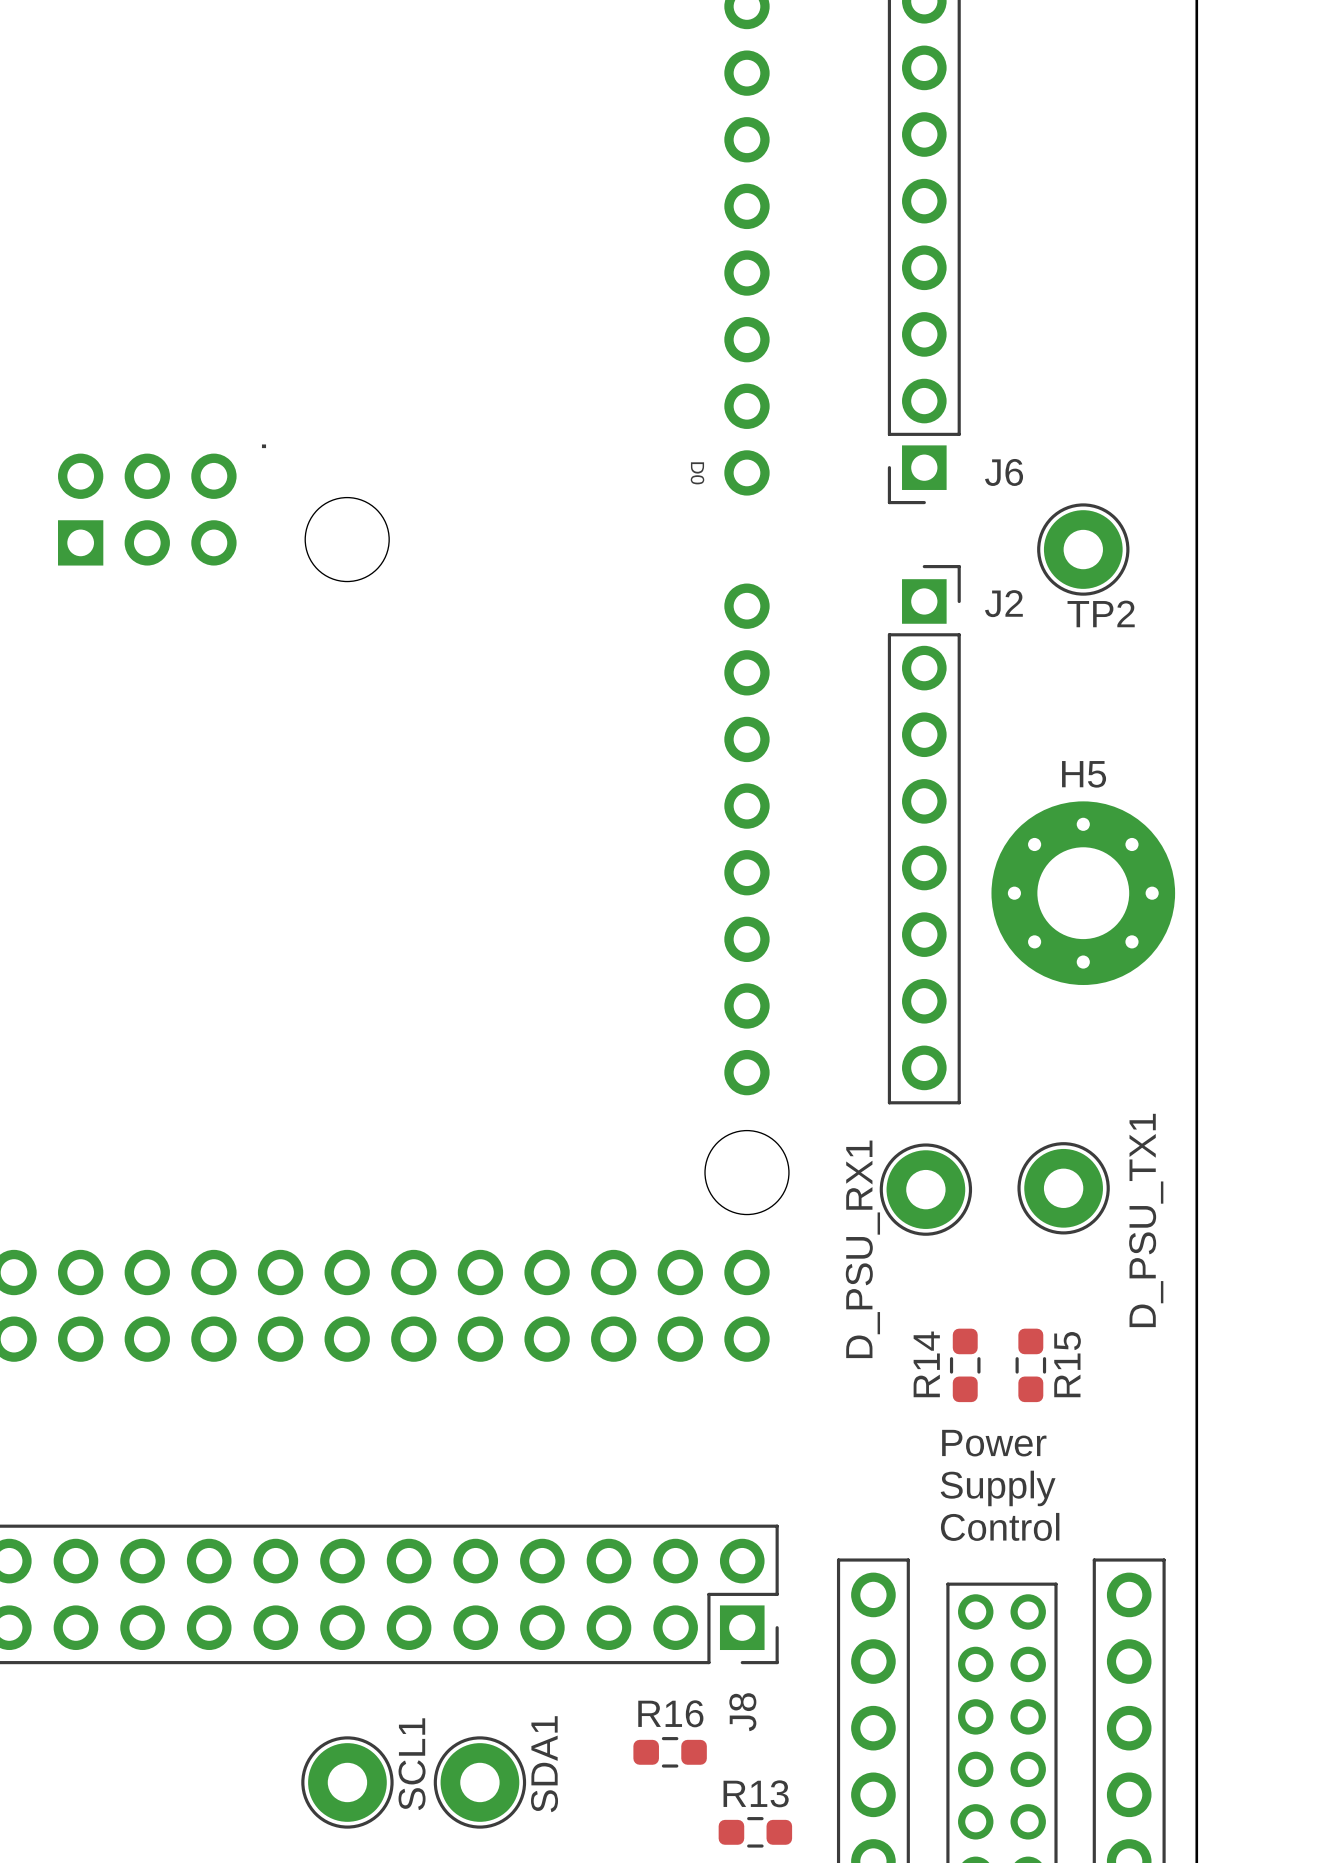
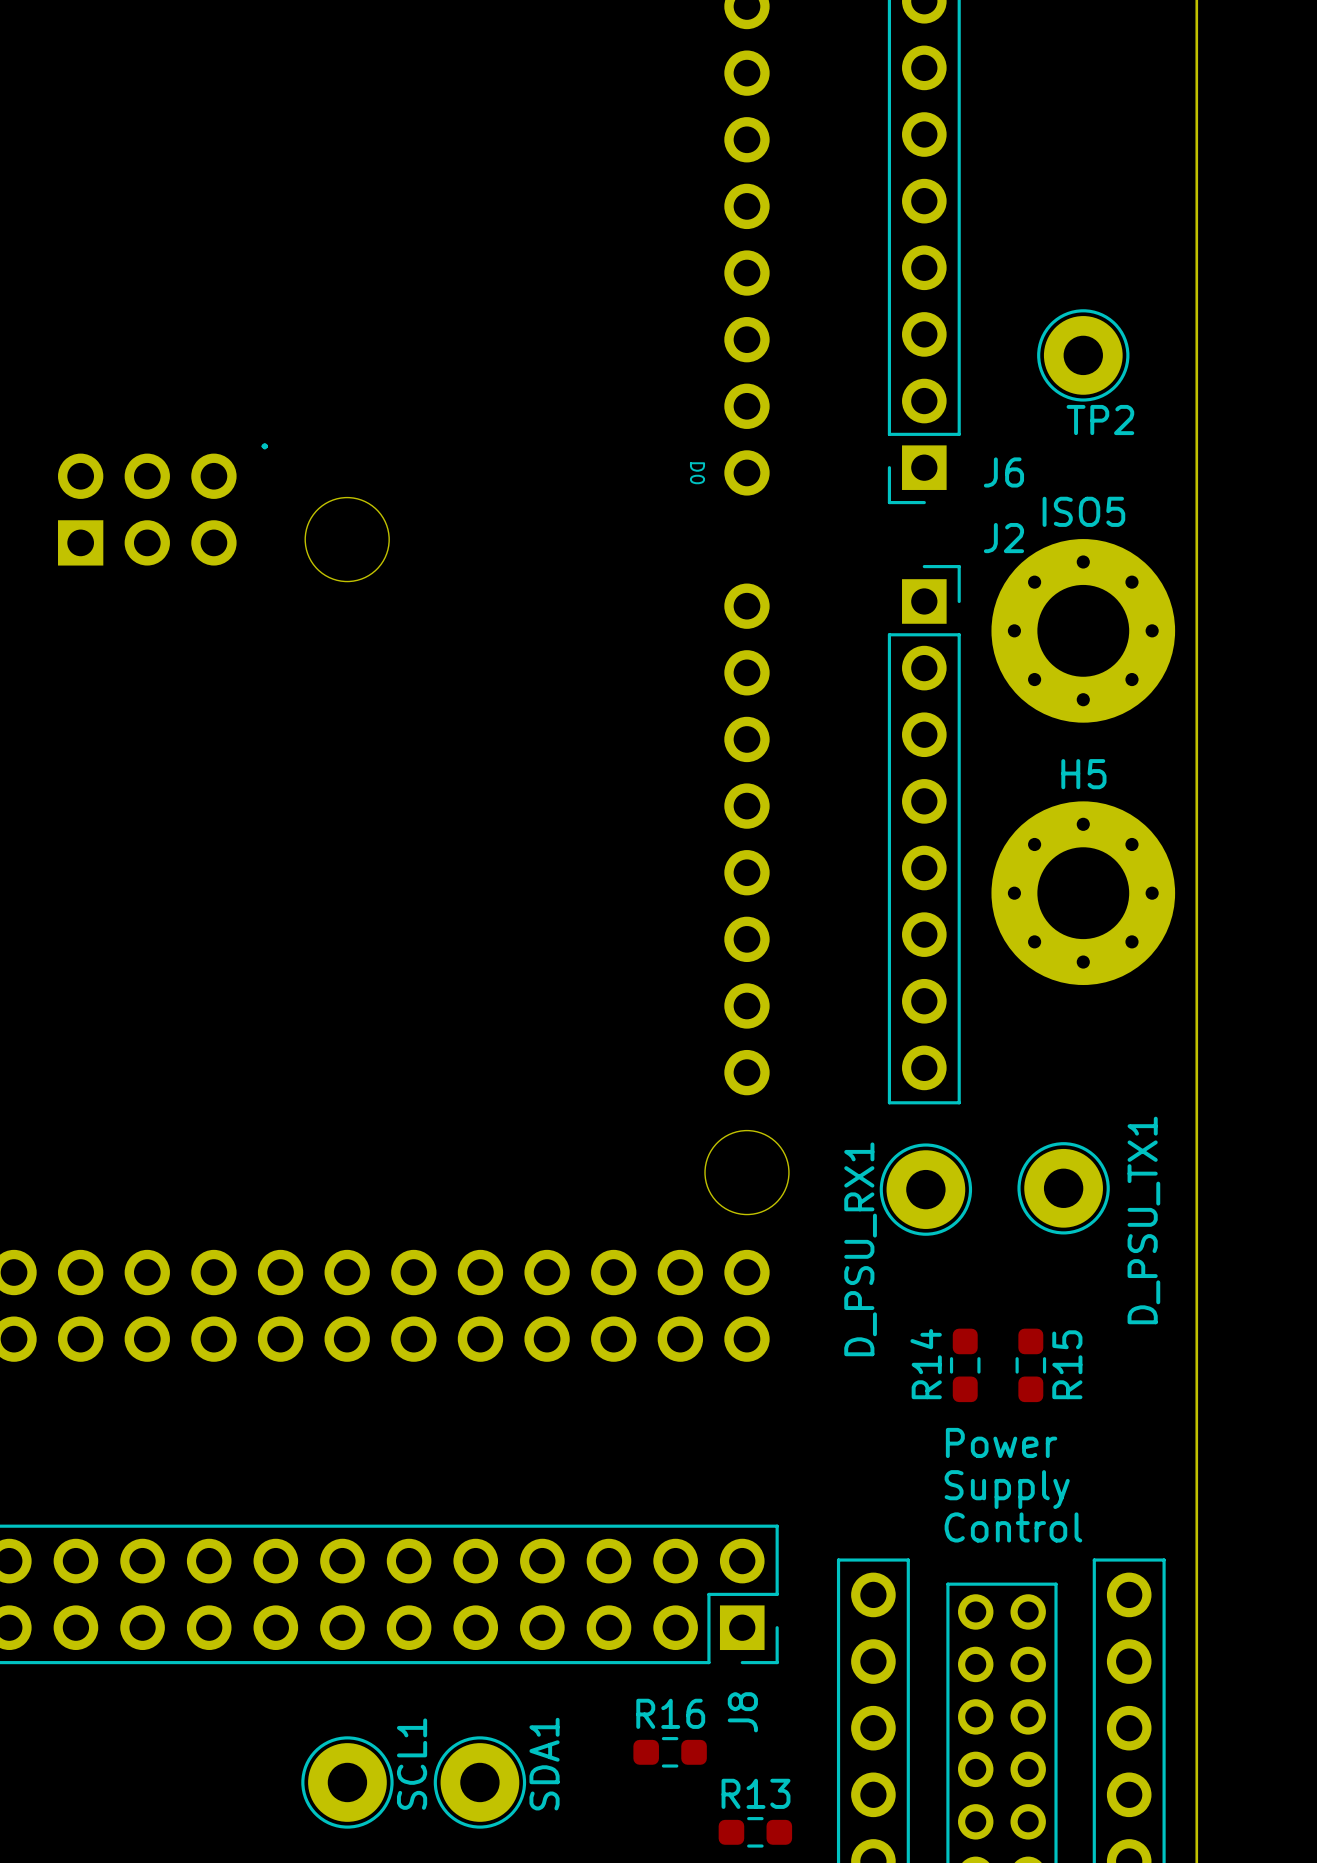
TP2 position: (1083, 549) -> (1083, 355)
J2 name position: J2 (1003, 603) -> J2 (1003, 538)
ISO5: none -> (1083, 630)

